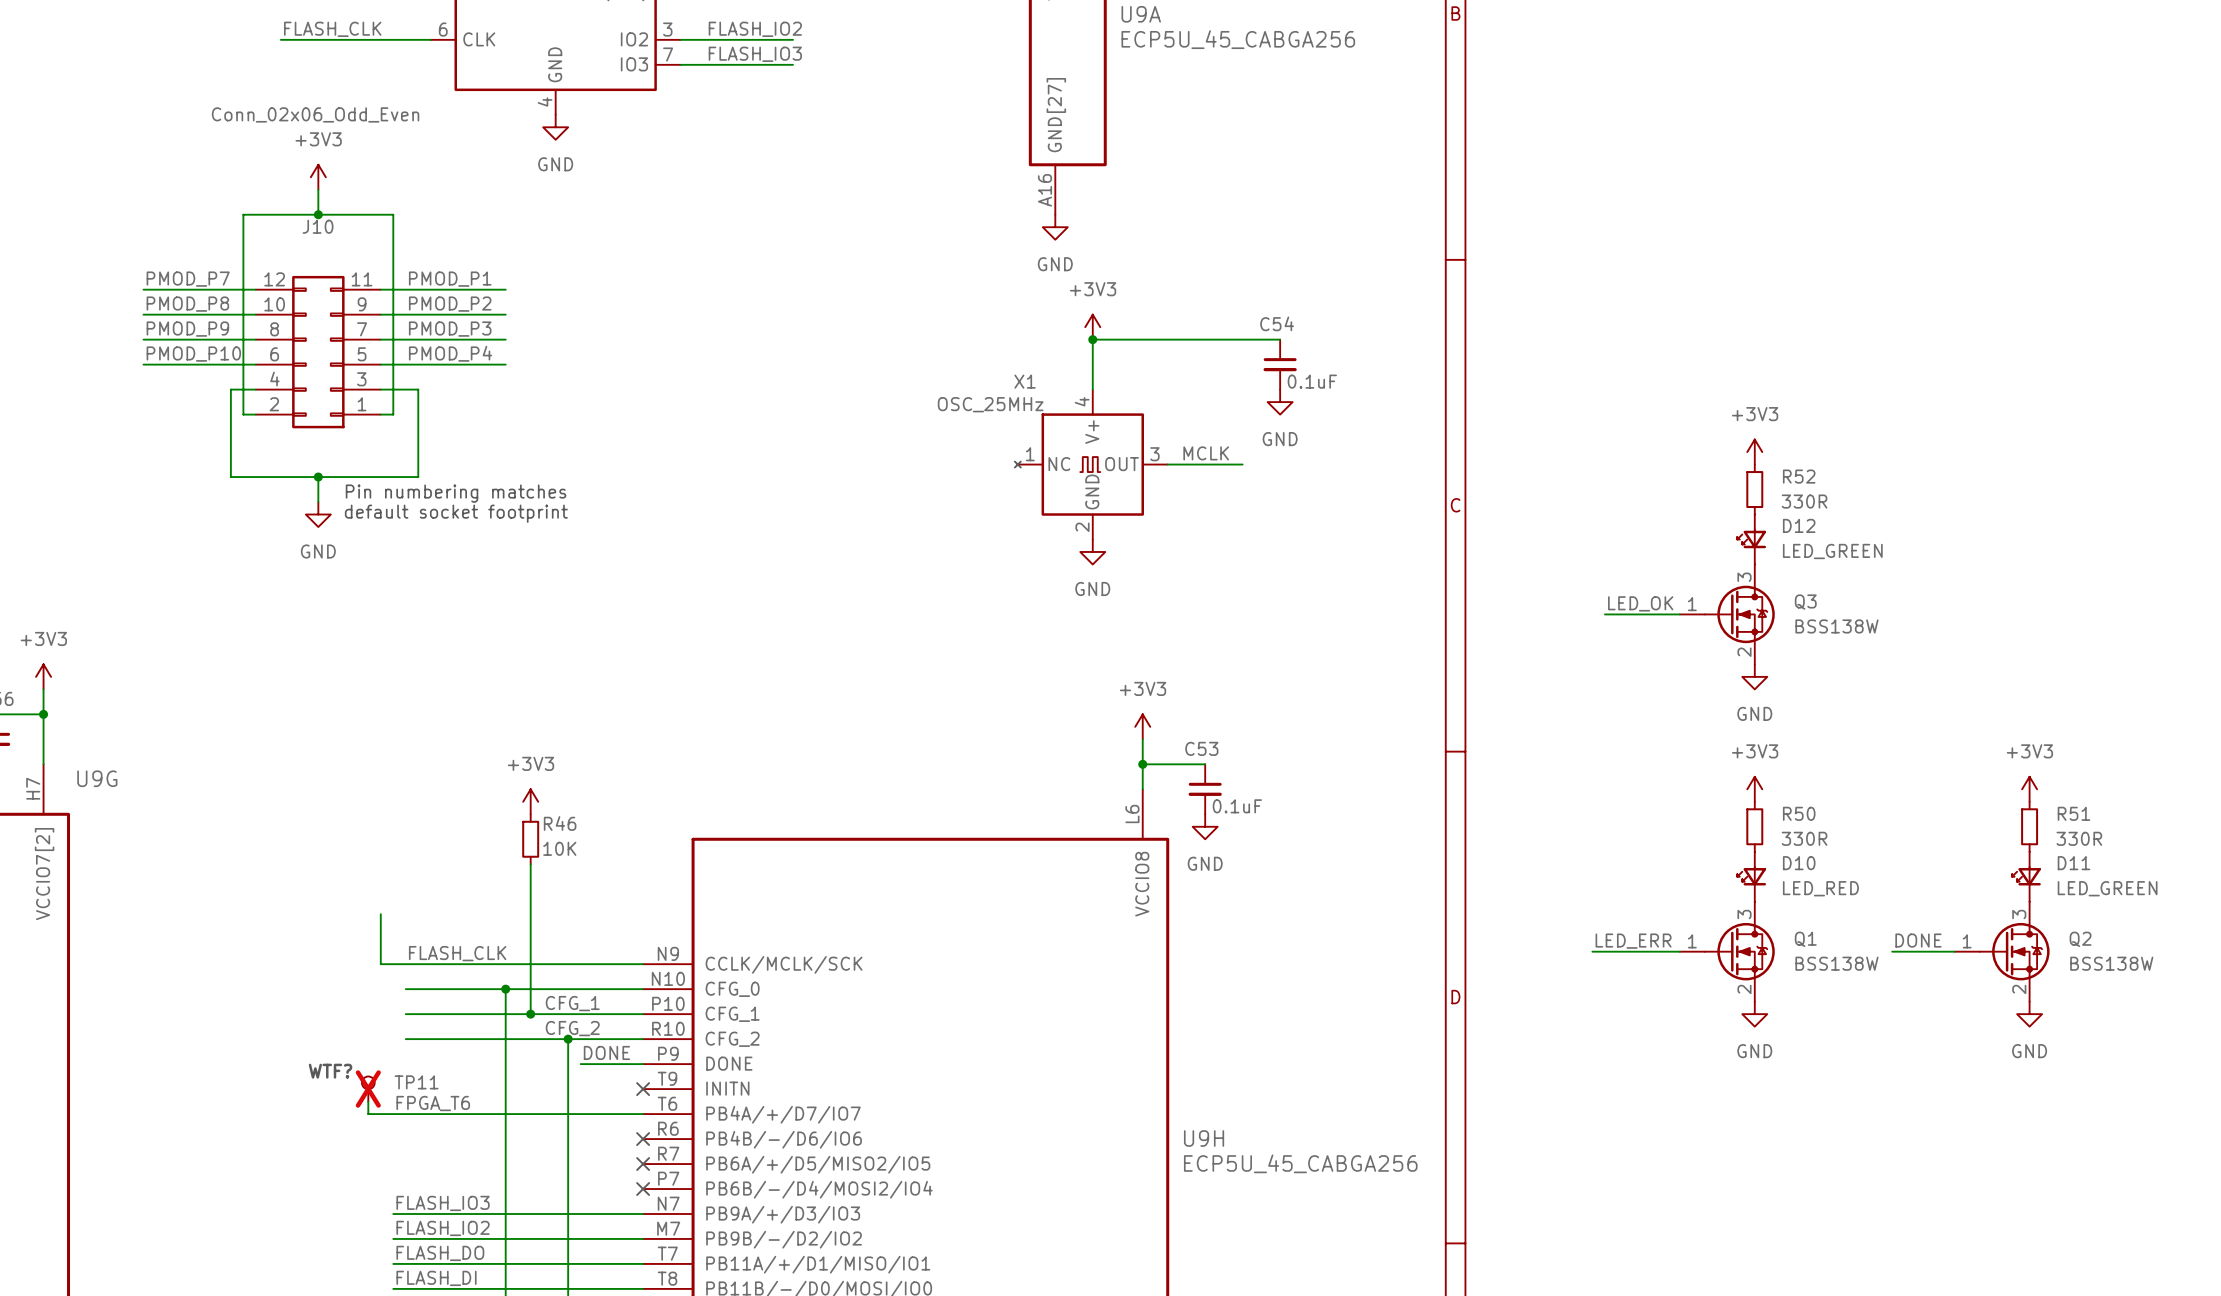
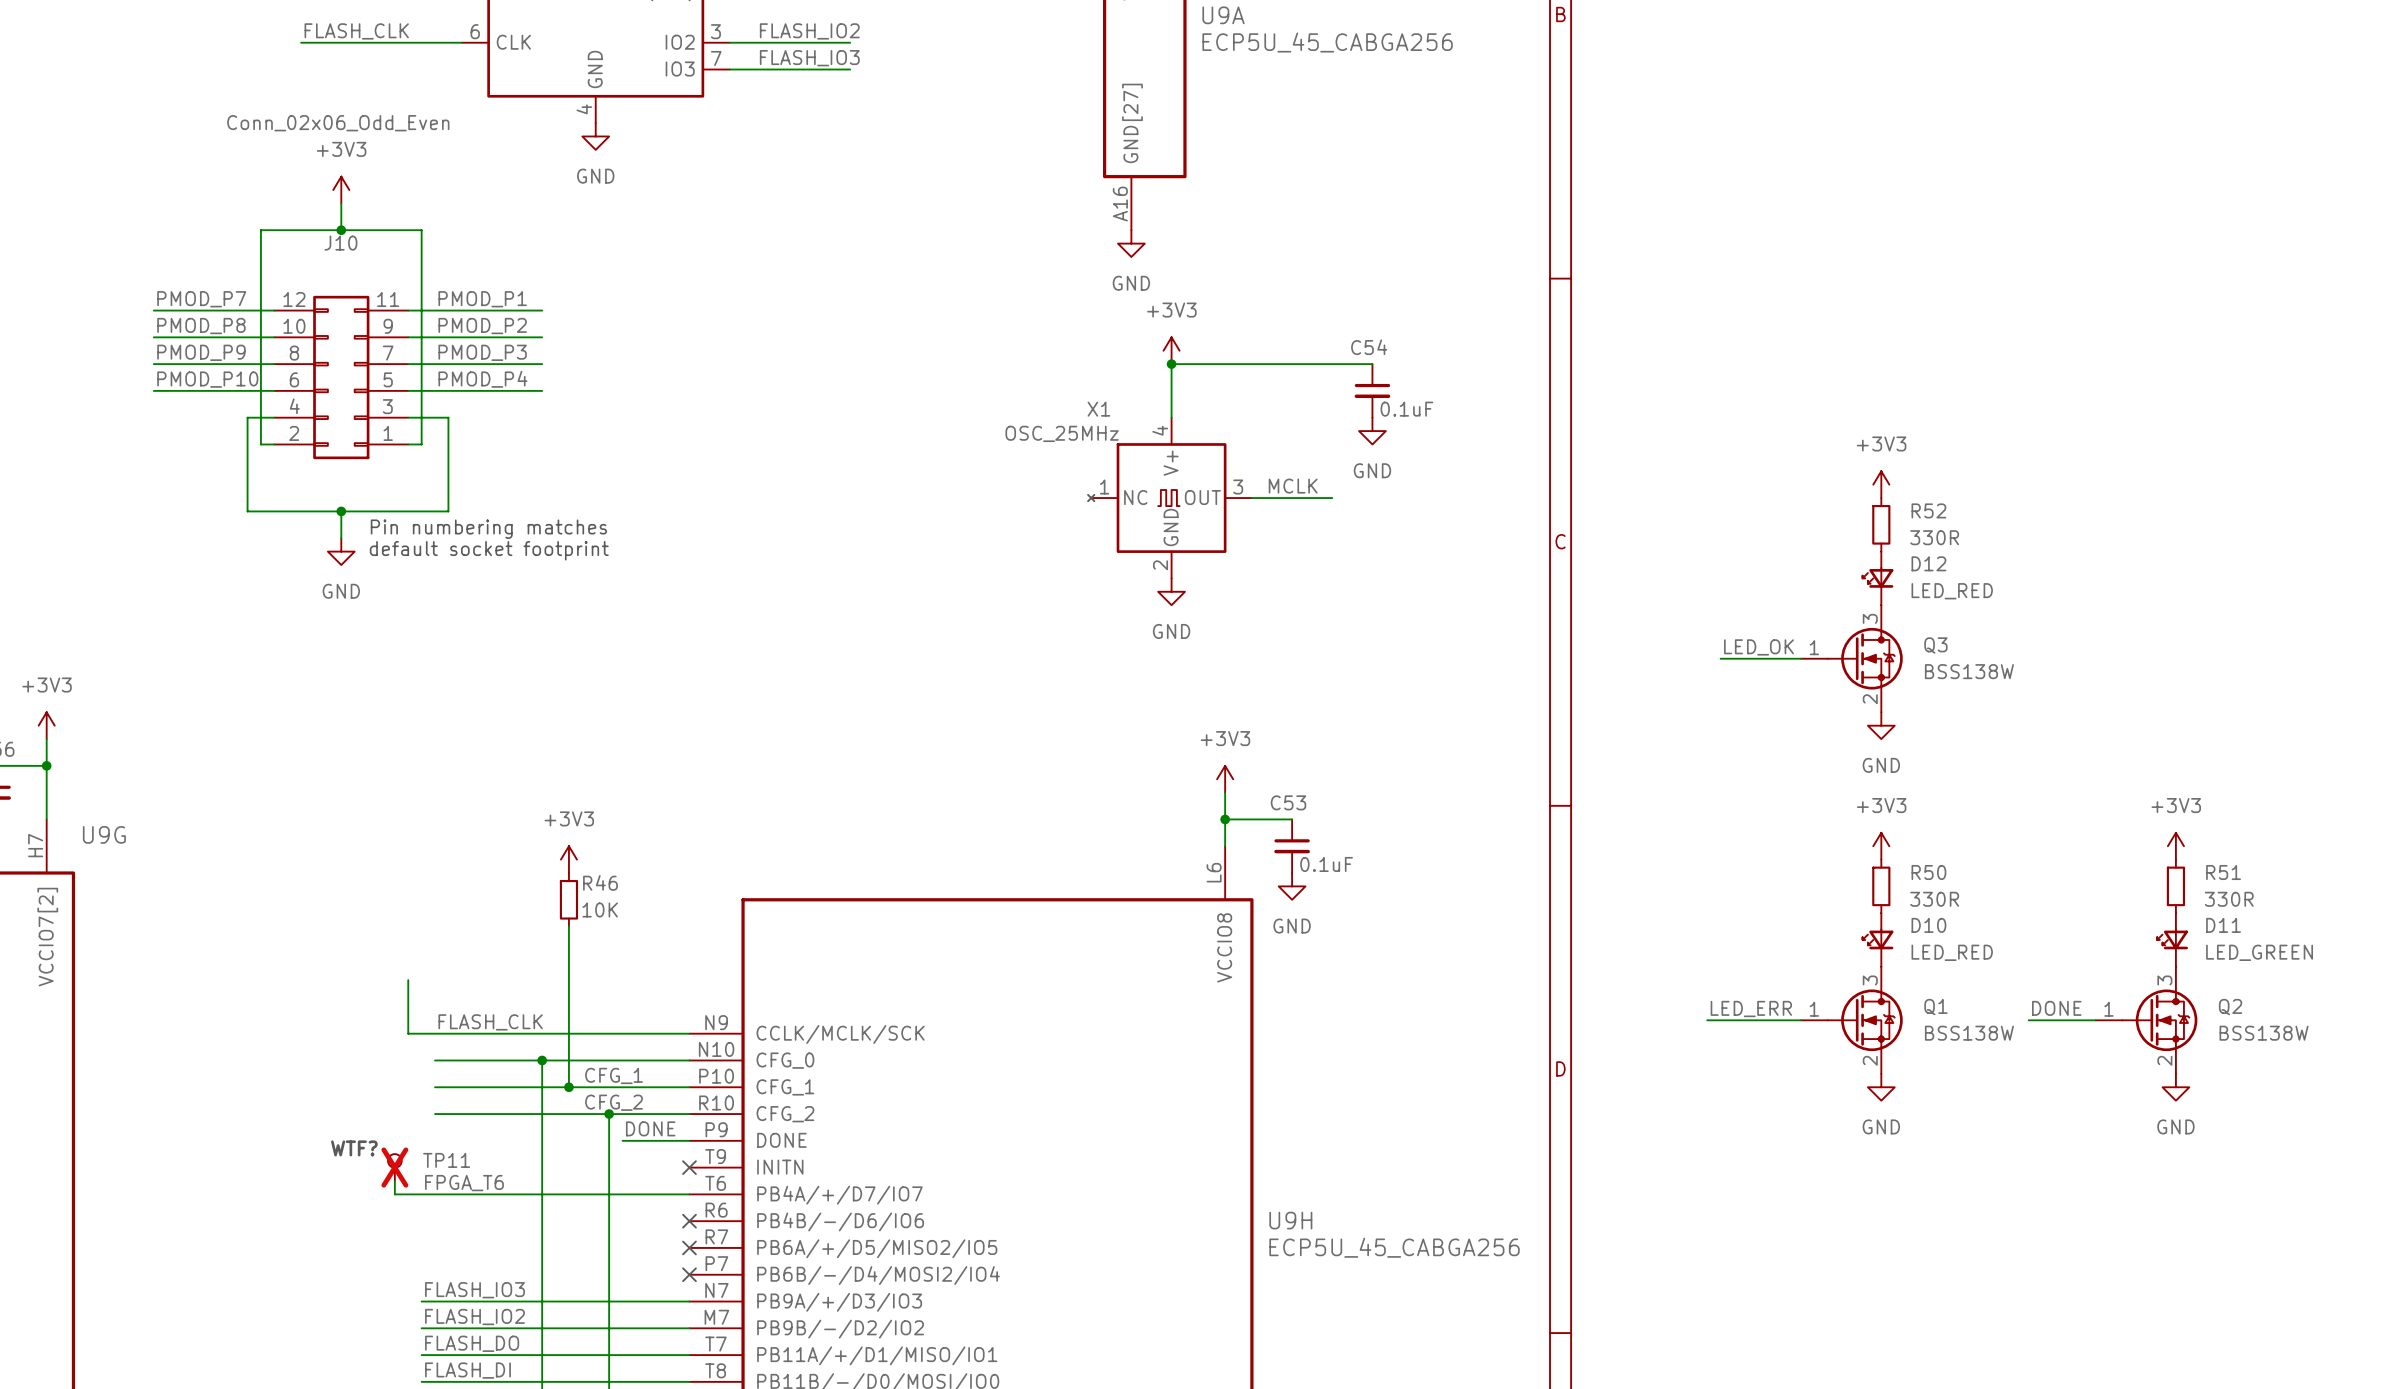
D12 value: LED_GREEN (1832, 551) -> LED_RED (1952, 591)

